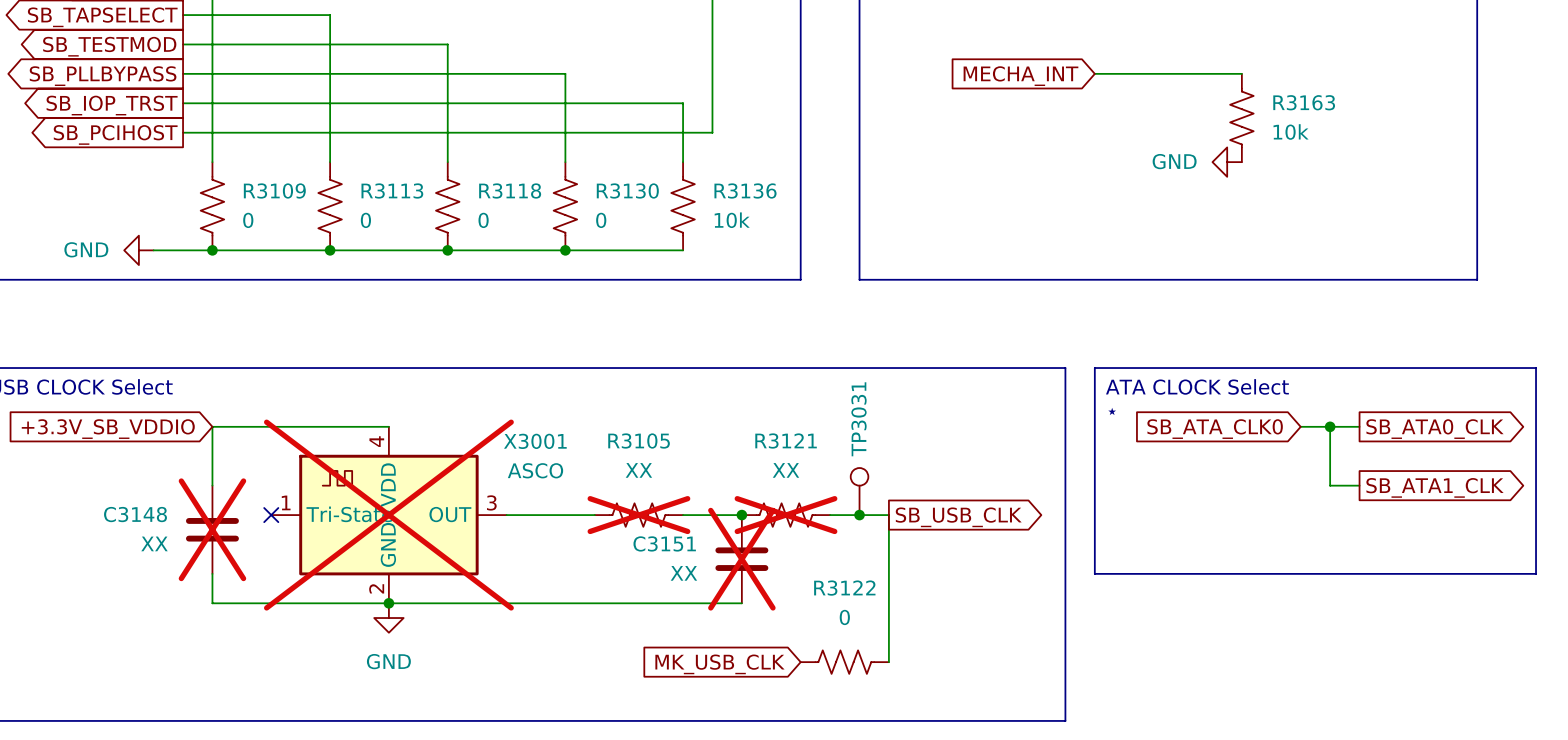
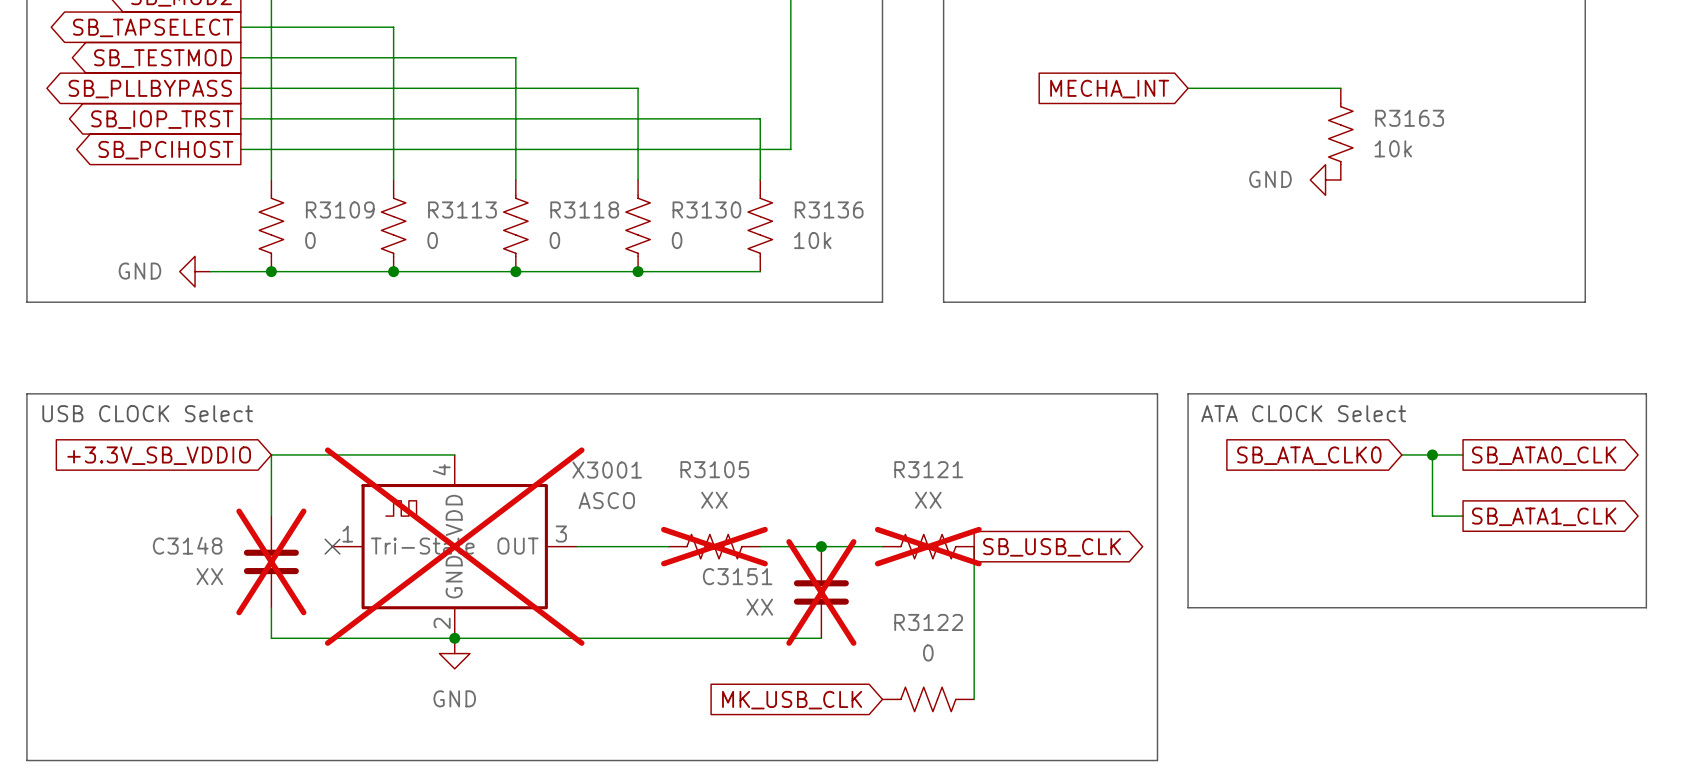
text: ⋆ (1112, 411) -> none
TP3031: (859, 491) -> none
R3121 position: (786, 515) -> (928, 546)
junction: (859, 515) -> none

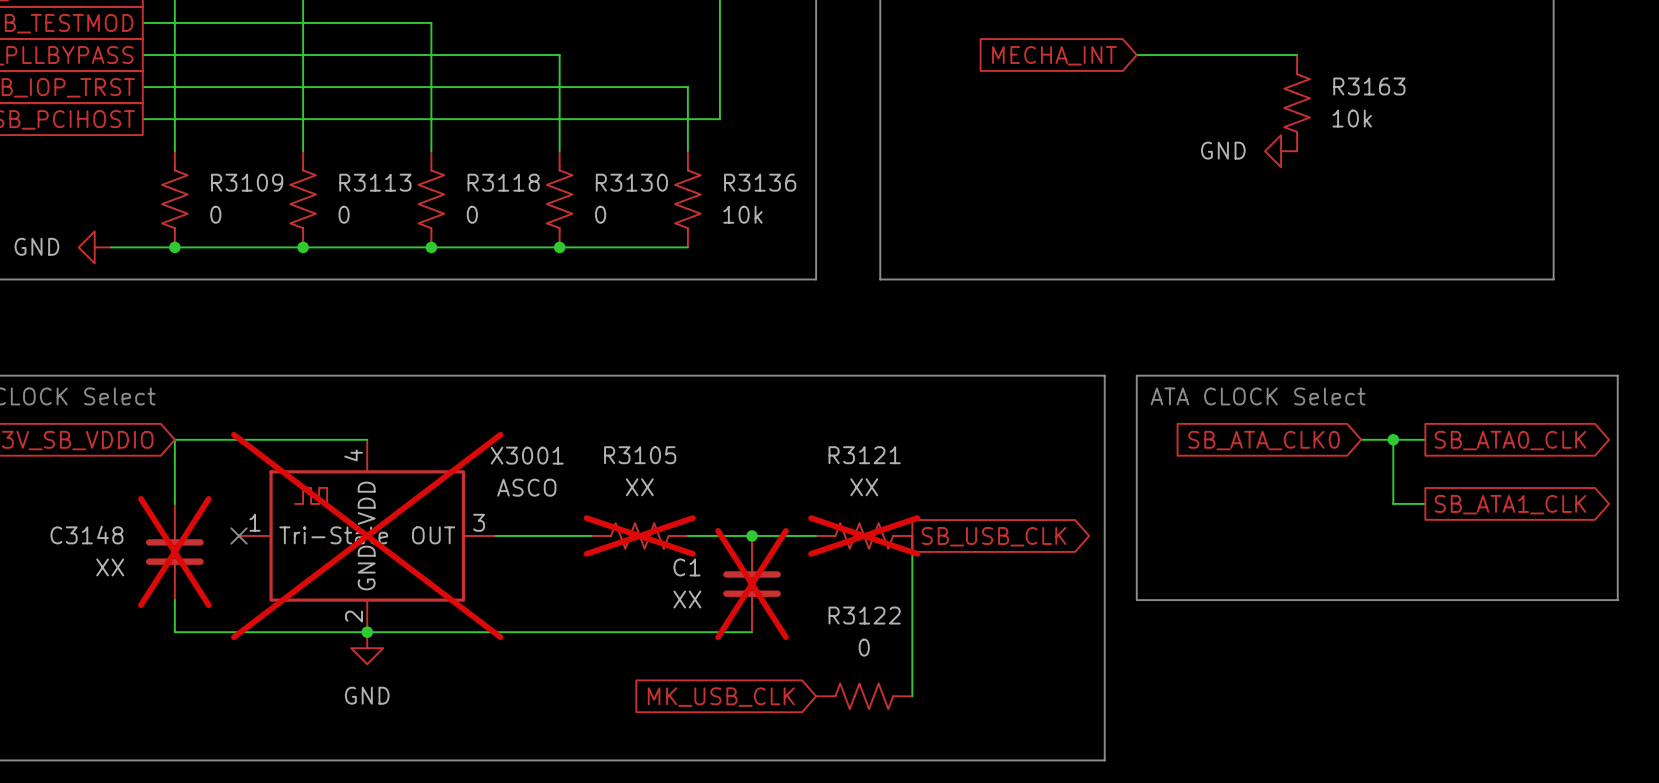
C3151 name: C3151 (737, 576) -> C1 (687, 567)

